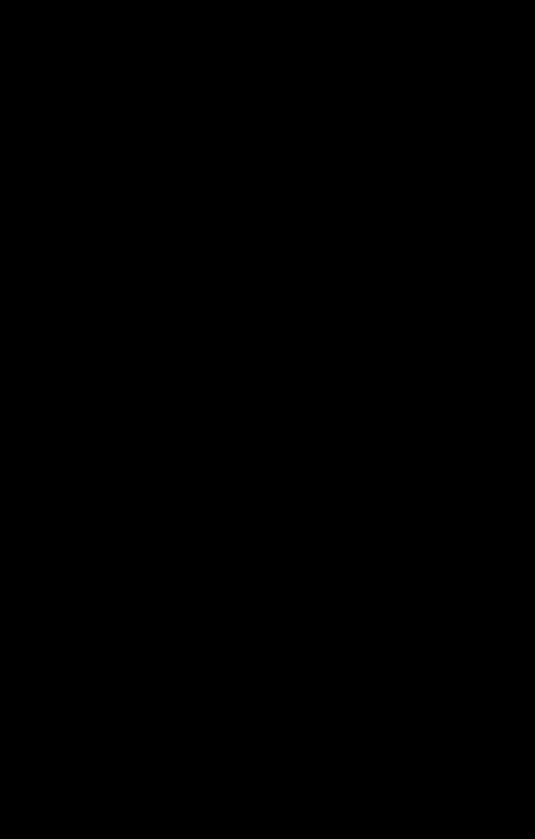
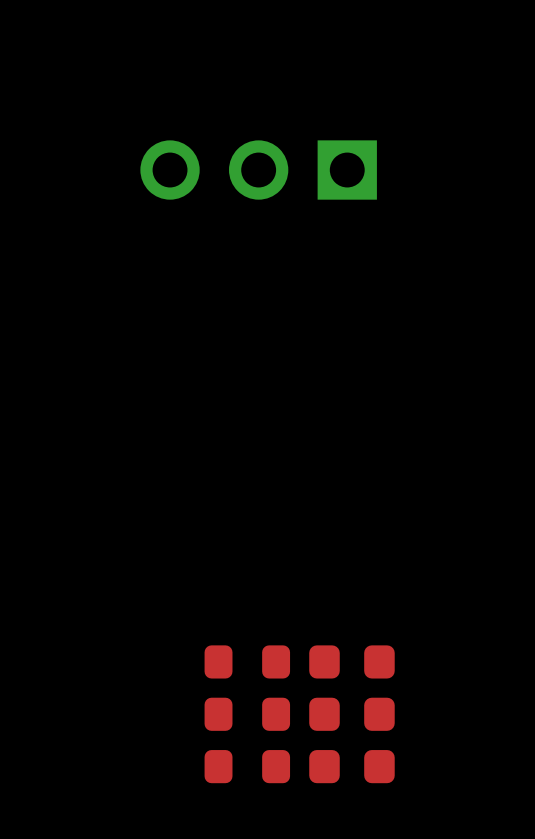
part: none -> (258, 170)
part: none -> (247, 661)
part: none -> (351, 661)
part: none -> (247, 714)
part: none -> (351, 714)
part: none -> (247, 766)
part: none -> (351, 766)

